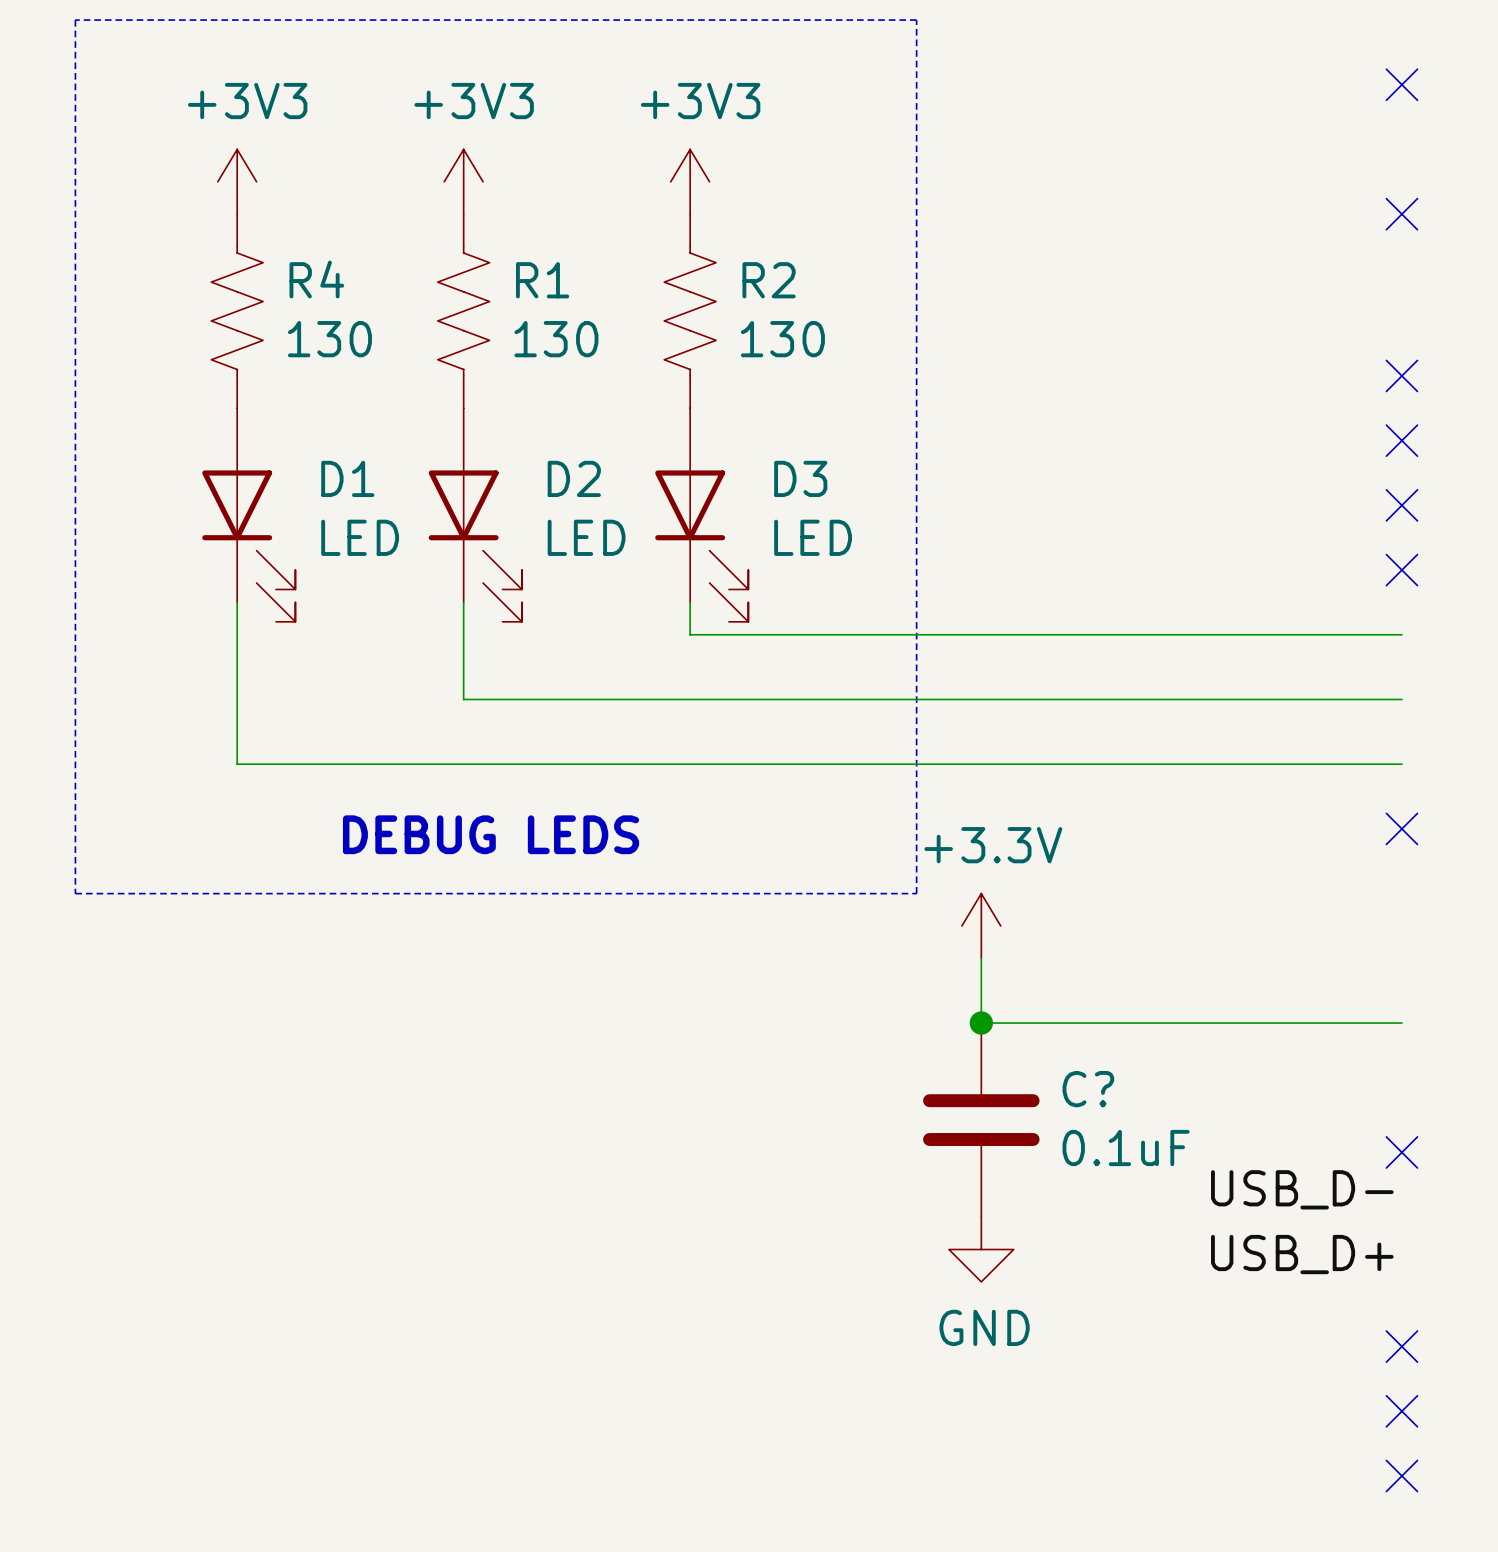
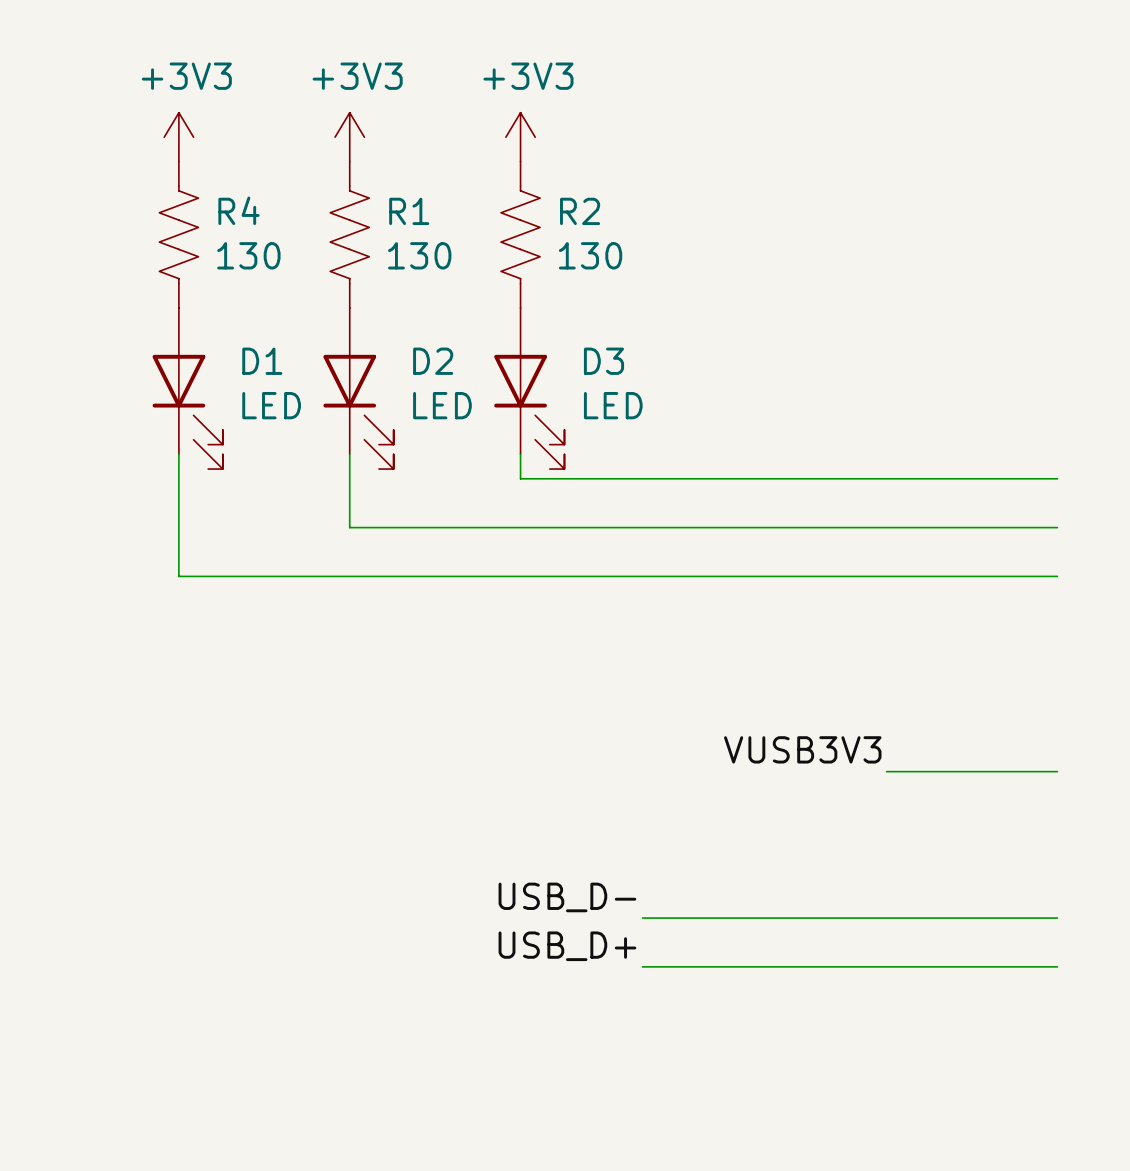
line: (75, 20) (75, 893) (916, 893) (916, 20) (75, 20) -> none
no-connect mark: (1401, 84) -> none
no-connect mark: (1401, 214) -> none
no-connect mark: (1401, 375) -> none
no-connect mark: (1401, 440) -> none
no-connect mark: (1401, 505) -> none
no-connect mark: (1401, 570) -> none
no-connect mark: (1401, 828) -> none
text: DEBUG LEDS (491, 834) -> none
power symbol: +3.3V (981, 925) -> none
wire: (981, 958) (981, 1023) (1175, 1023) -> none
label: none -> VUSB3V3 (802, 749)
junction: (981, 1023) -> none
C?: 0.1uF (981, 1120) -> none
no-connect mark: (1401, 1152) -> none
label position: USB_D- (1302, 1189) -> USB_D- (567, 897)
wire: none -> (642, 918) (1057, 918)
power symbol: GND (981, 1249) -> none
label position: USB_D+ (1302, 1254) -> USB_D+ (567, 946)
wire: none -> (642, 966) (1057, 966)
no-connect mark: (1401, 1346) -> none
no-connect mark: (1401, 1411) -> none
no-connect mark: (1401, 1475) -> none

